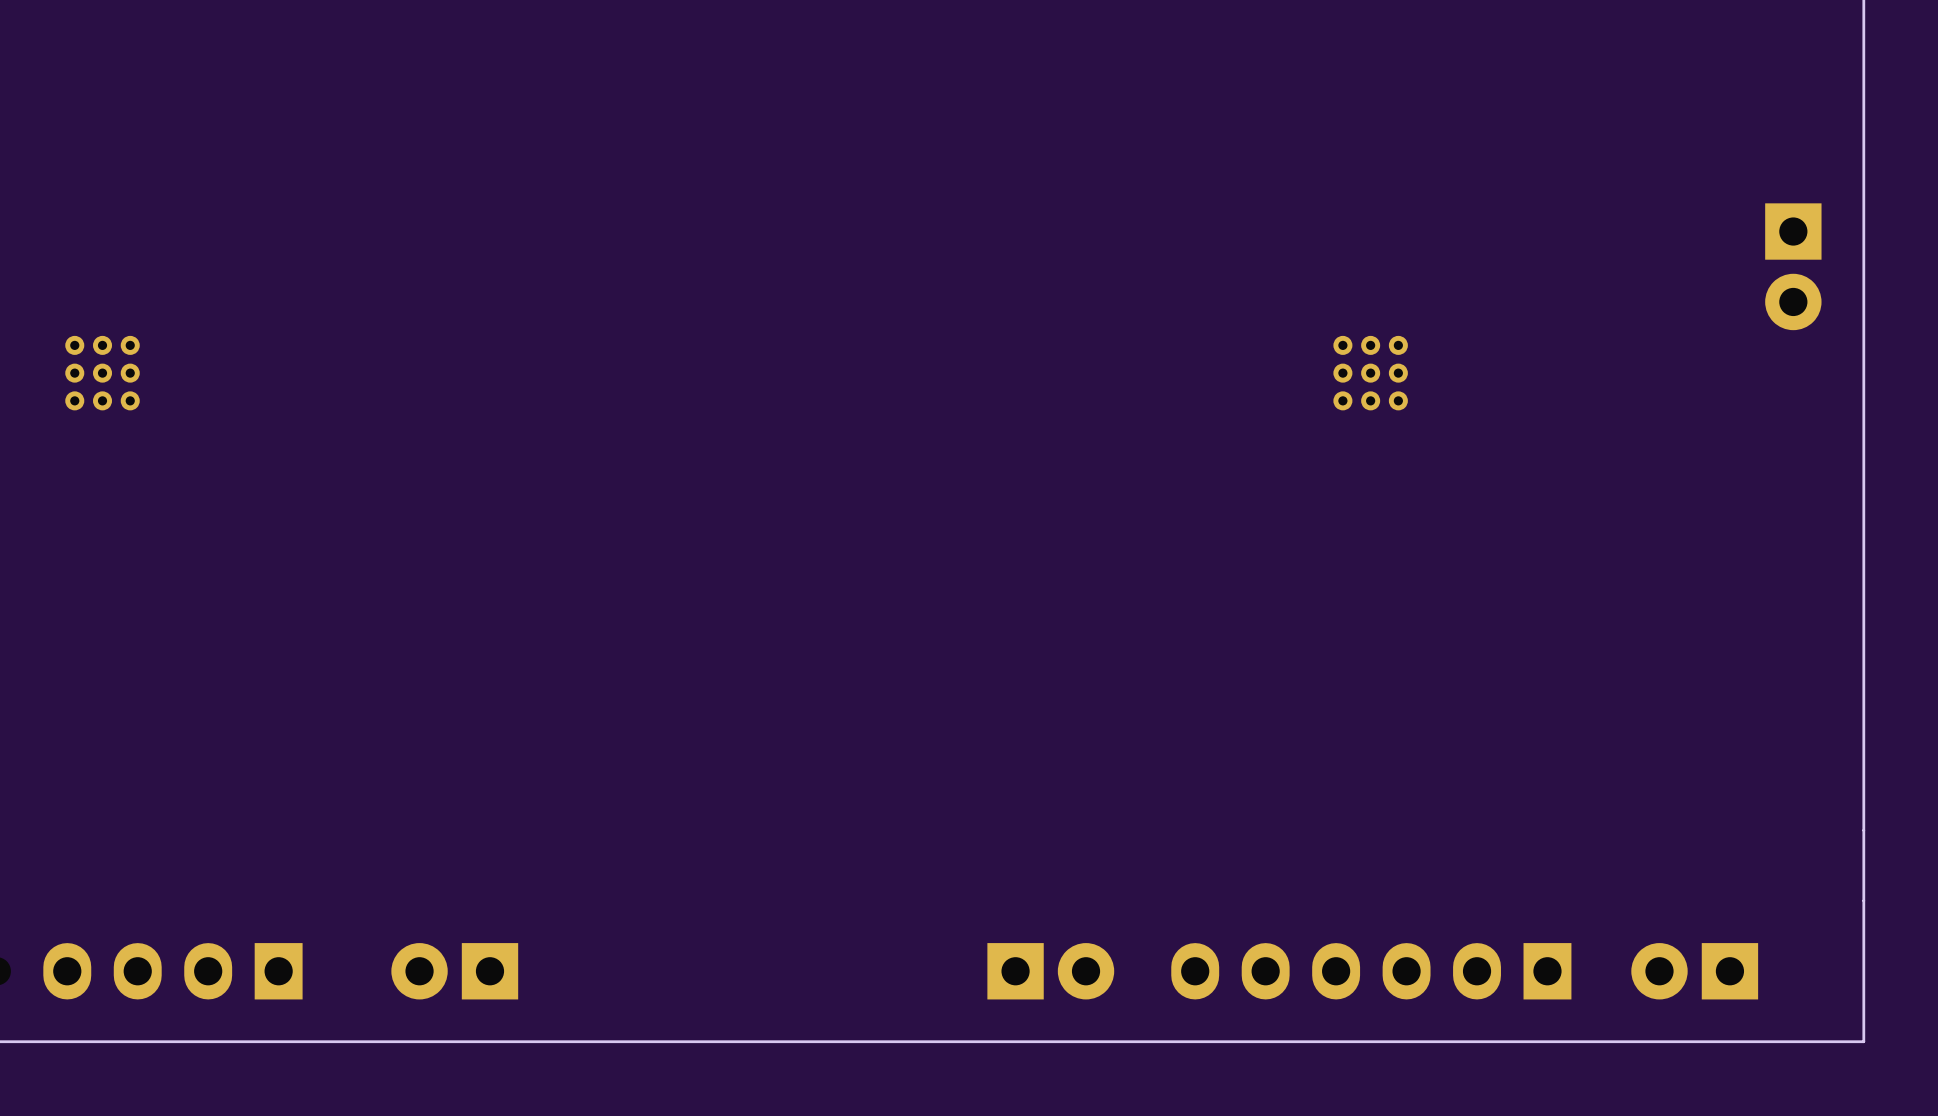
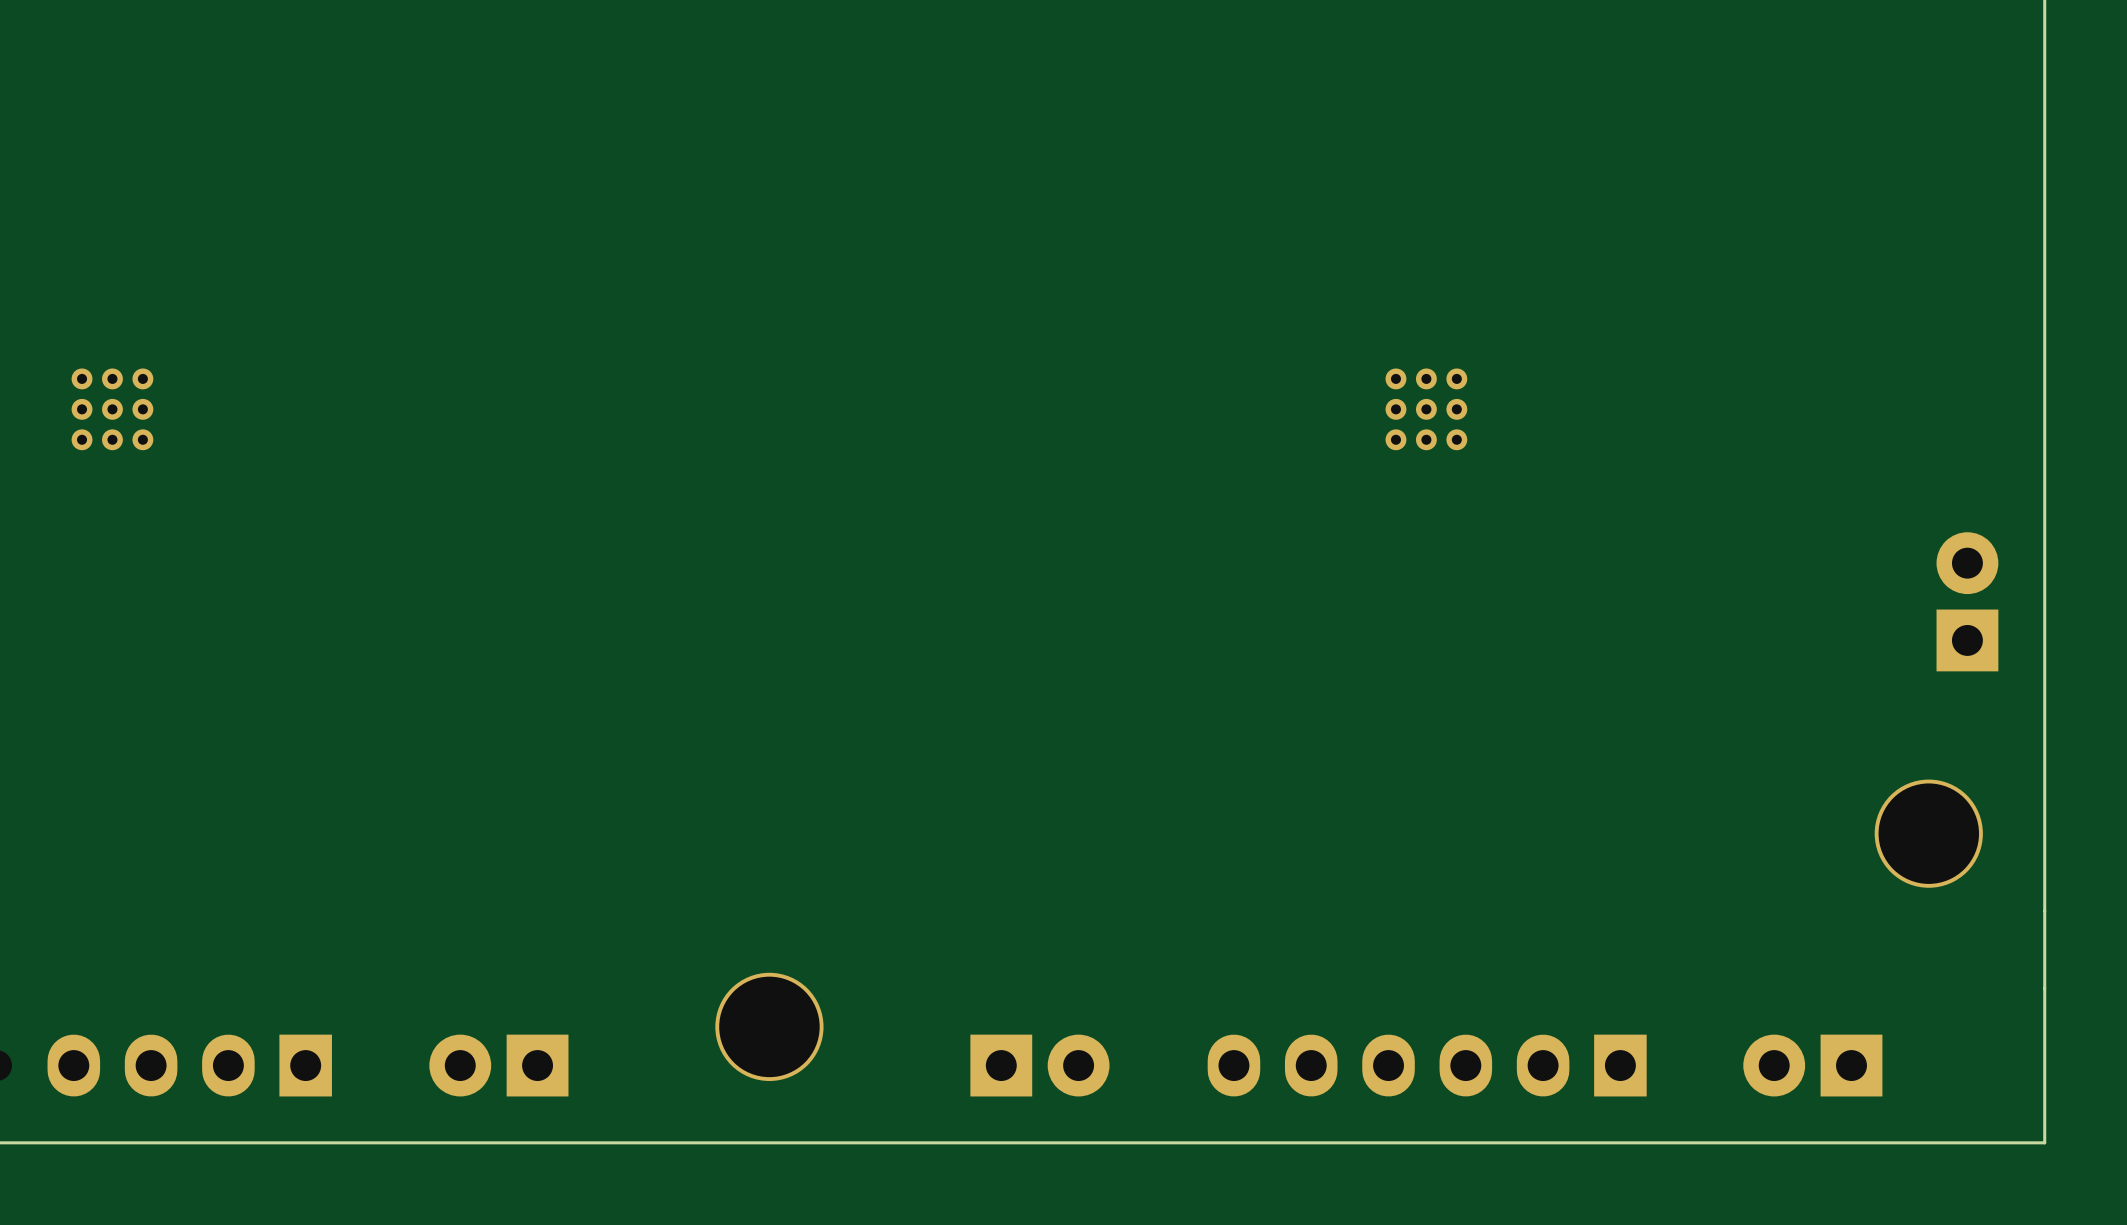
part: (1793, 266) -> none
part position: (1370, 373) -> (1426, 409)
part: none -> (1967, 601)
part: none -> (1928, 833)
part: none -> (769, 1026)
part position: (1050, 971) -> (1039, 1065)
part position: (1371, 971) -> (1427, 1065)
part position: (1694, 971) -> (1812, 1065)

